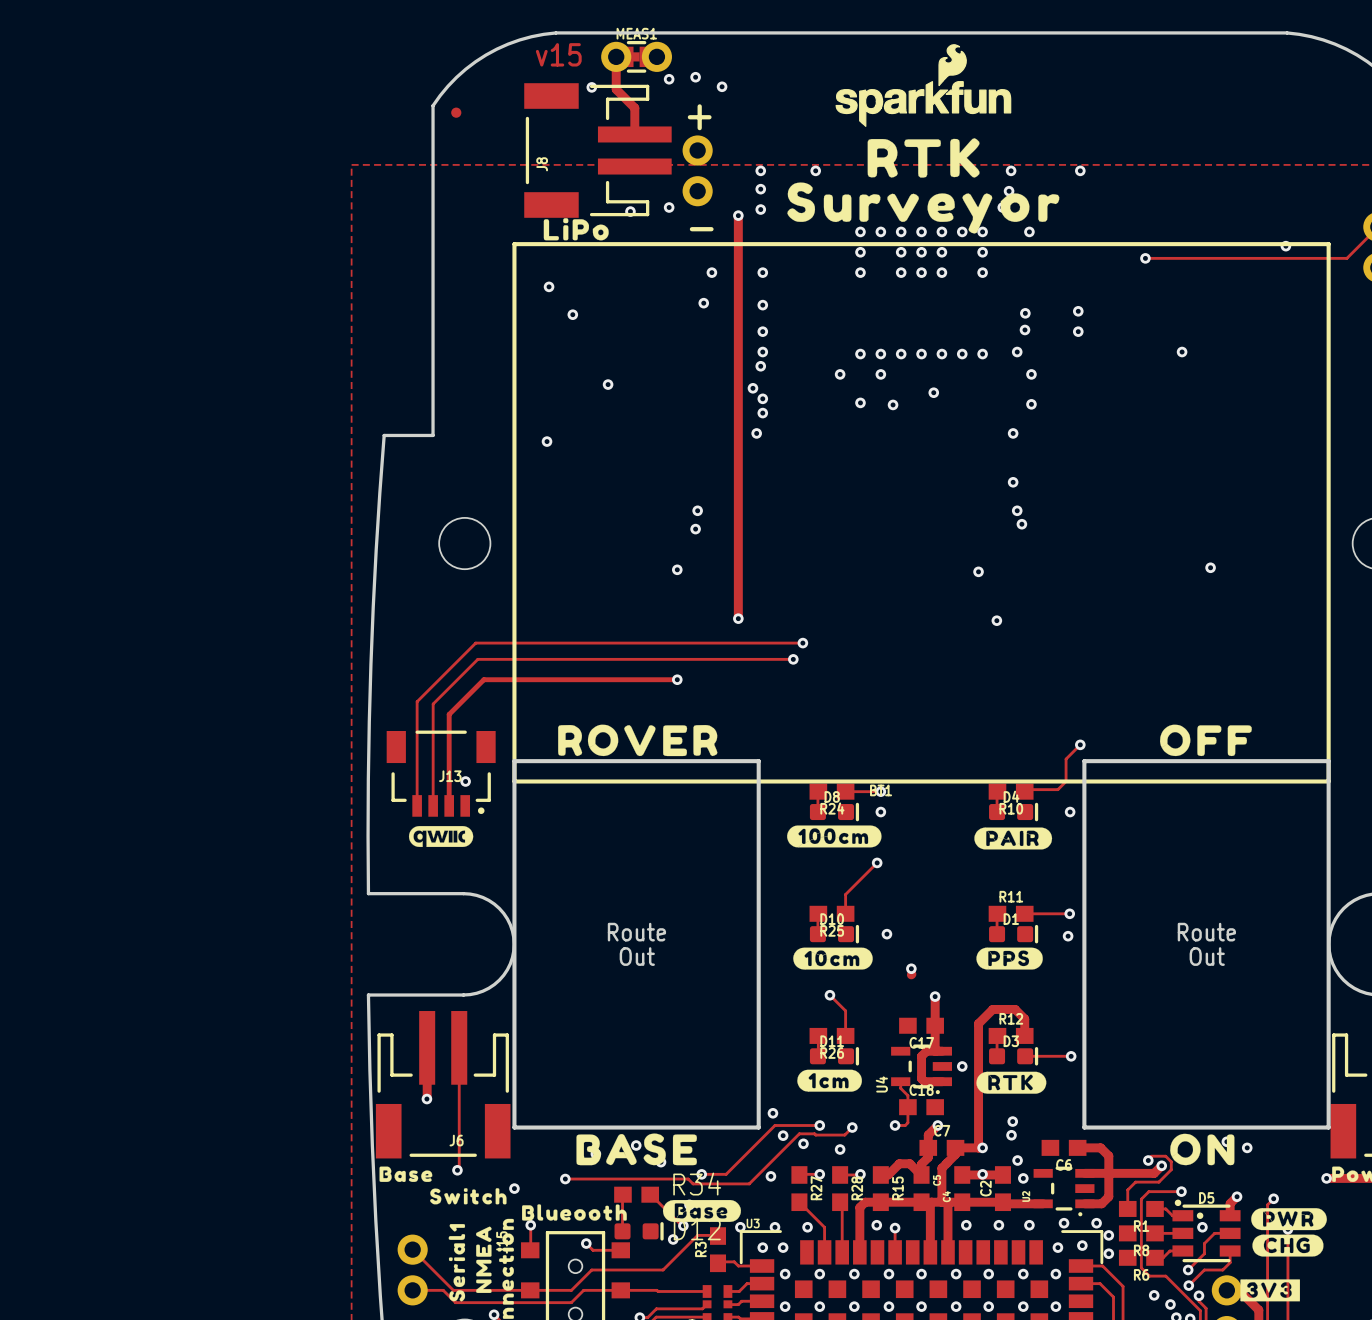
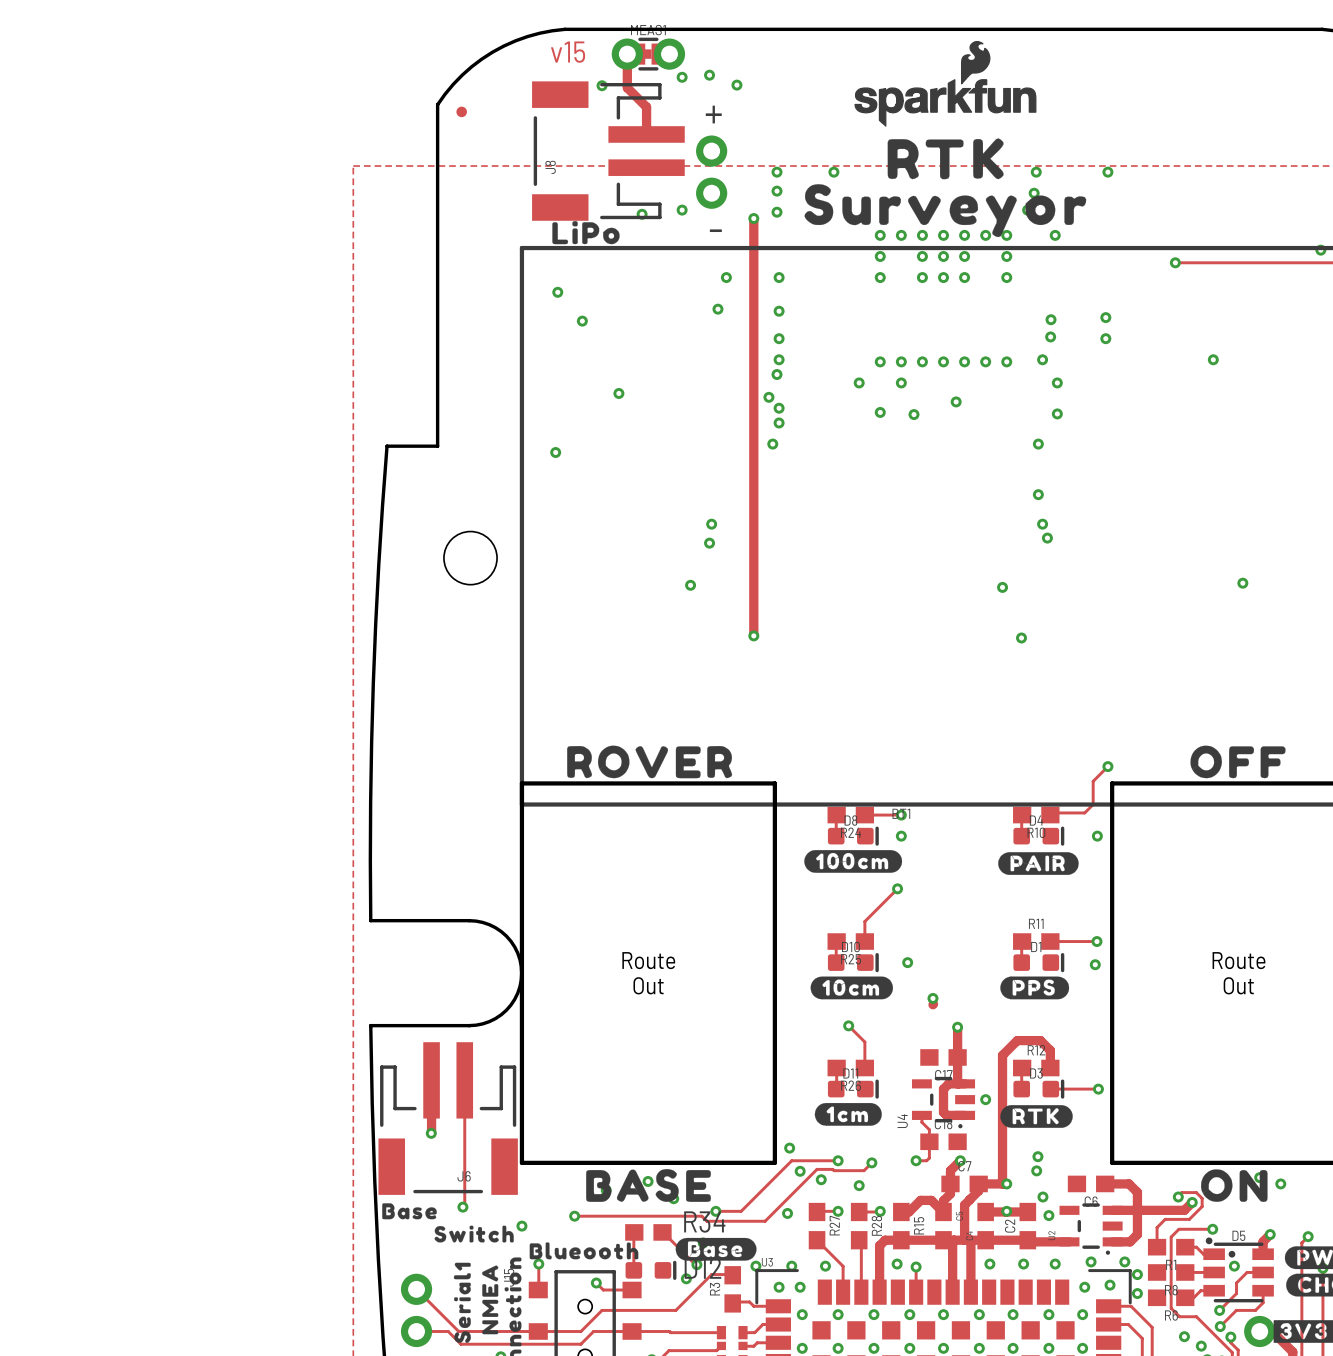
track: (802, 643) (475, 643) (417, 701) (417, 805) -> none
via: (802, 643) -> none
track: (793, 659) (477, 659) (433, 704) (433, 805) -> none
via: (793, 659) -> none
track: (677, 679) (483, 679) (449, 714) (449, 805) -> none
via: (677, 679) -> none
J13: (441, 773) -> none
via: (465, 781) -> none
drawing: [408, 826, 474, 848] -> none

